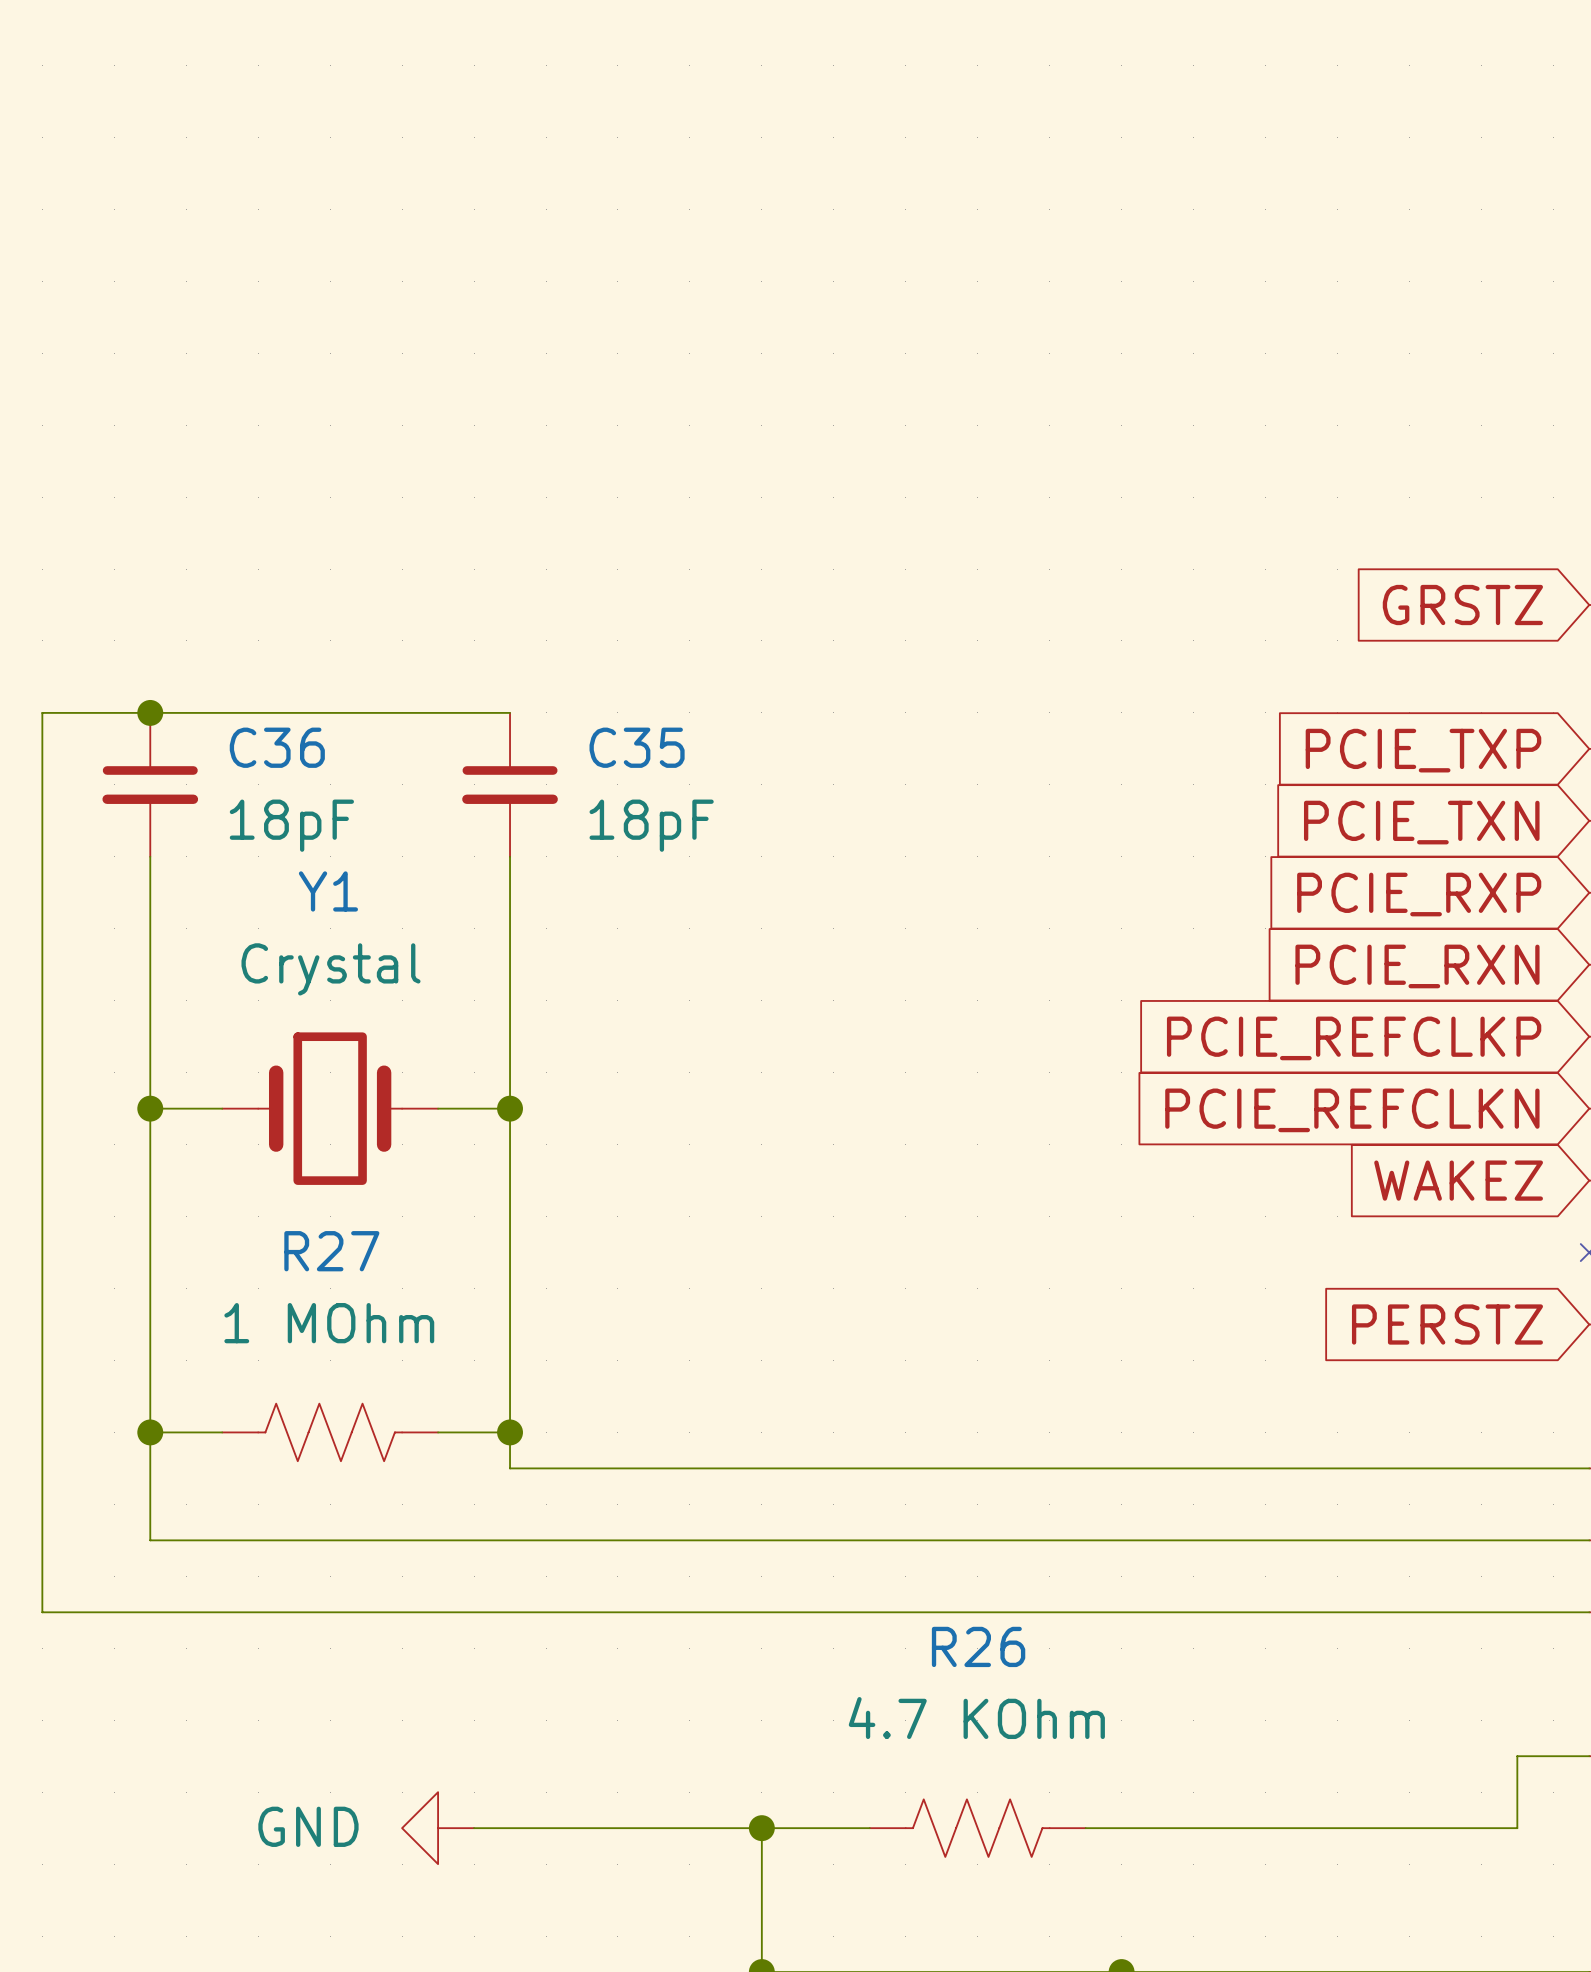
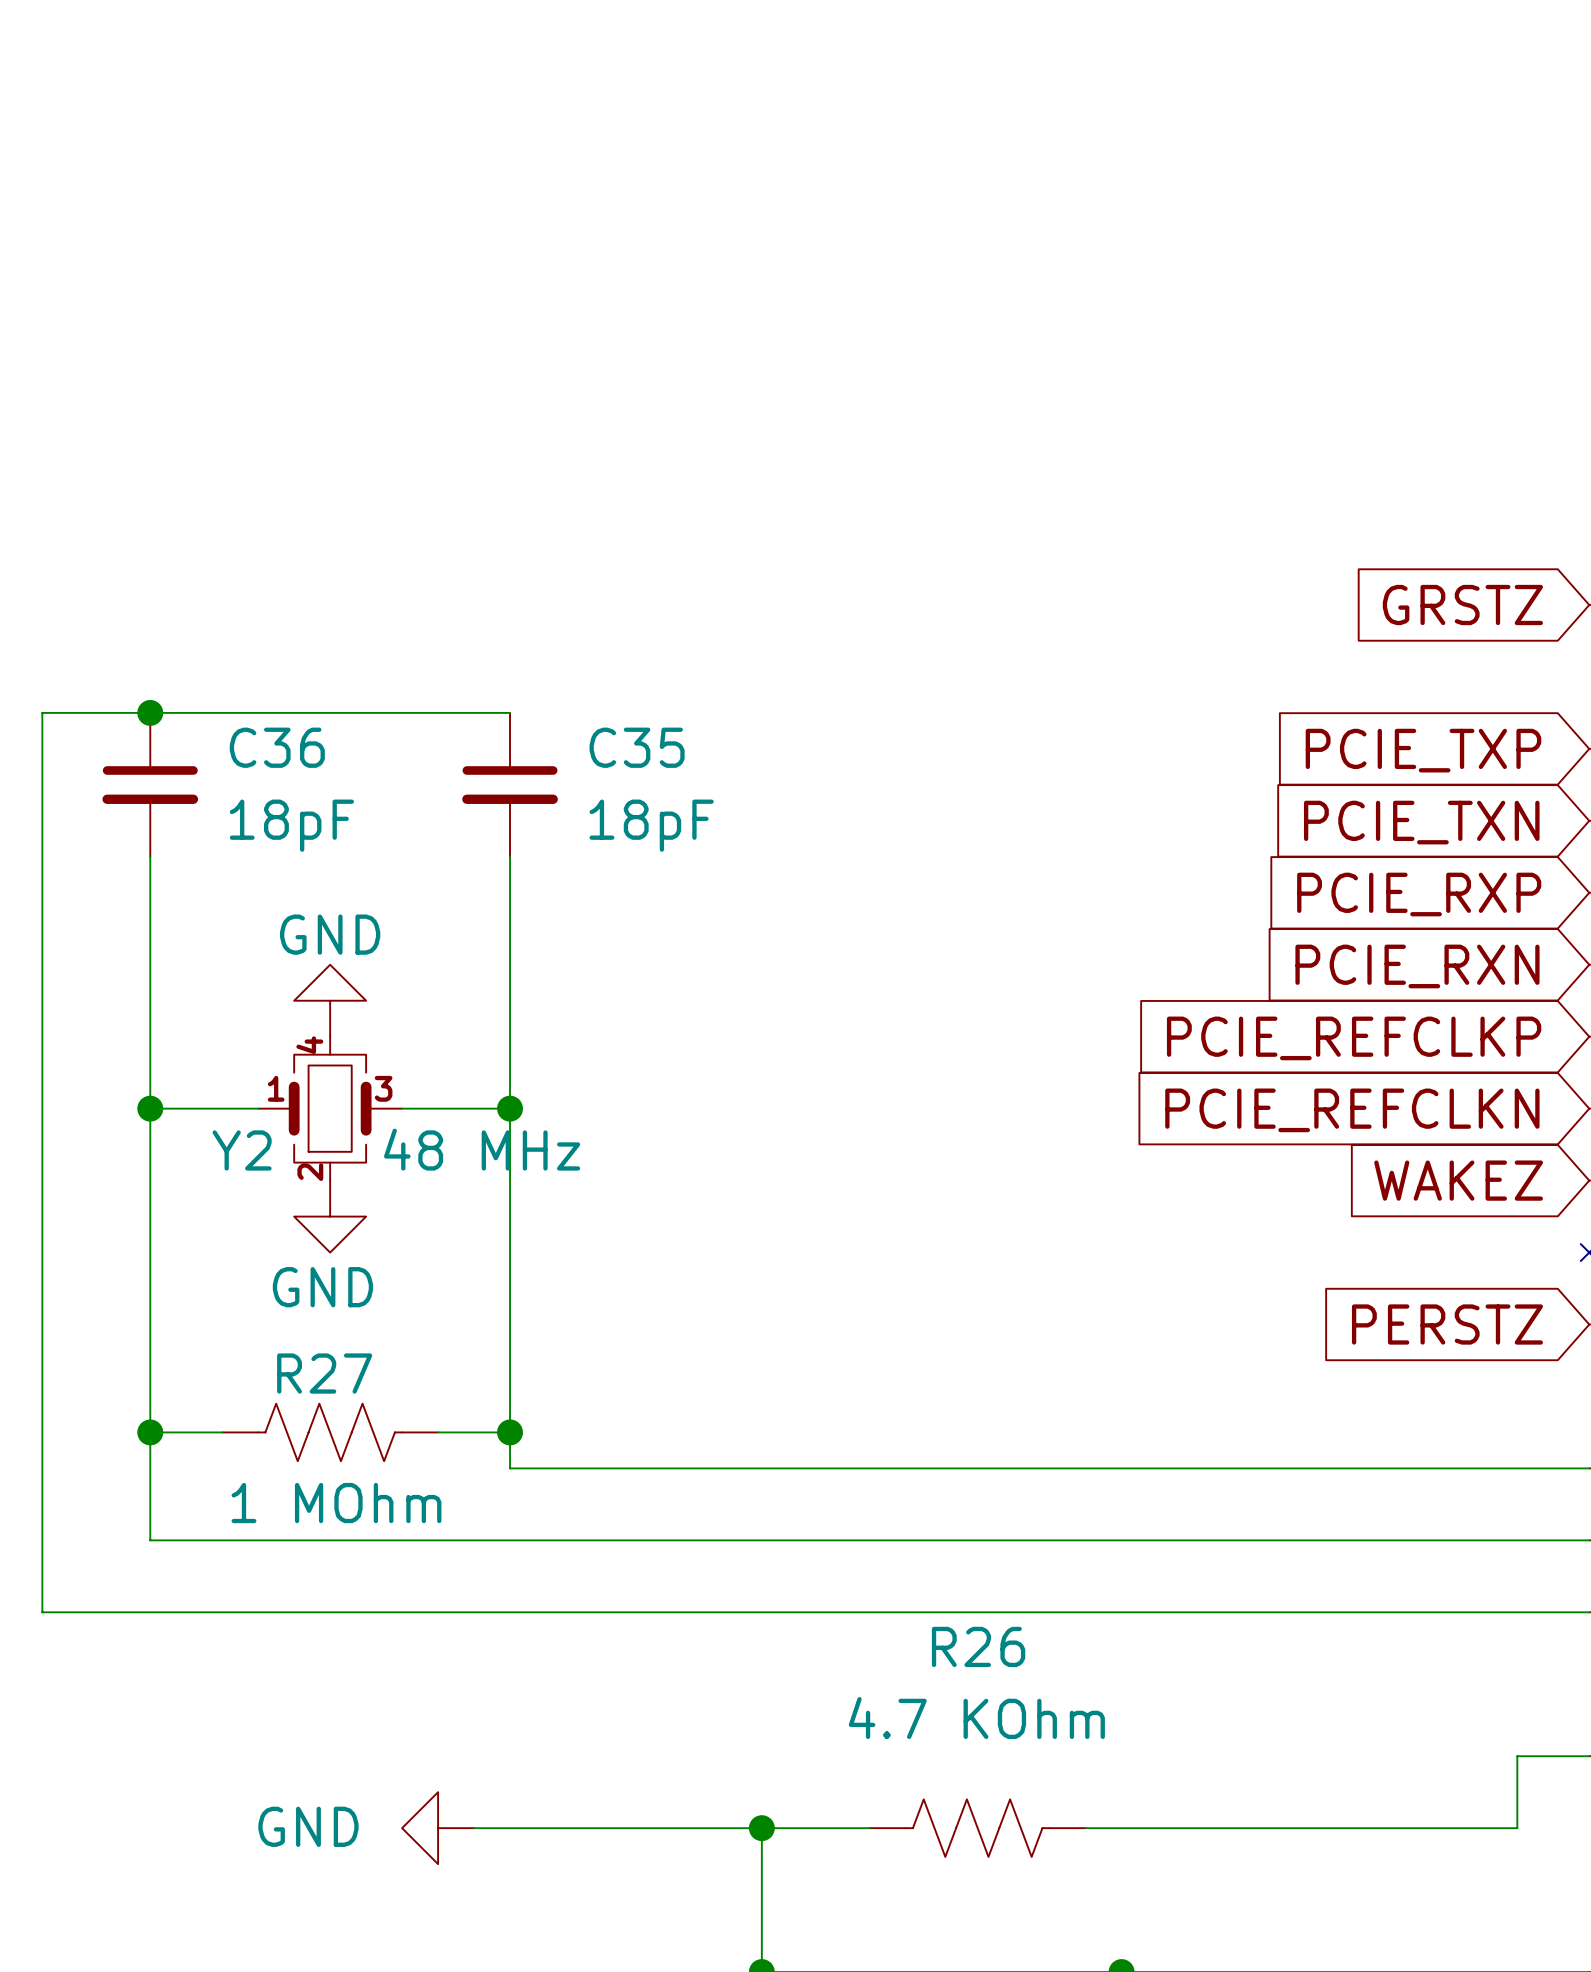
power symbol: none -> GND (330, 1000)
Y1: Crystal (330, 1108) -> none
Y2: none -> 48 MHz (330, 1108)
power symbol: none -> GND (330, 1216)
R27 name position: R27 (331, 1251) -> R27 (324, 1373)
R27 value position: 1 MOhm (329, 1323) -> 1 MOhm (336, 1503)

